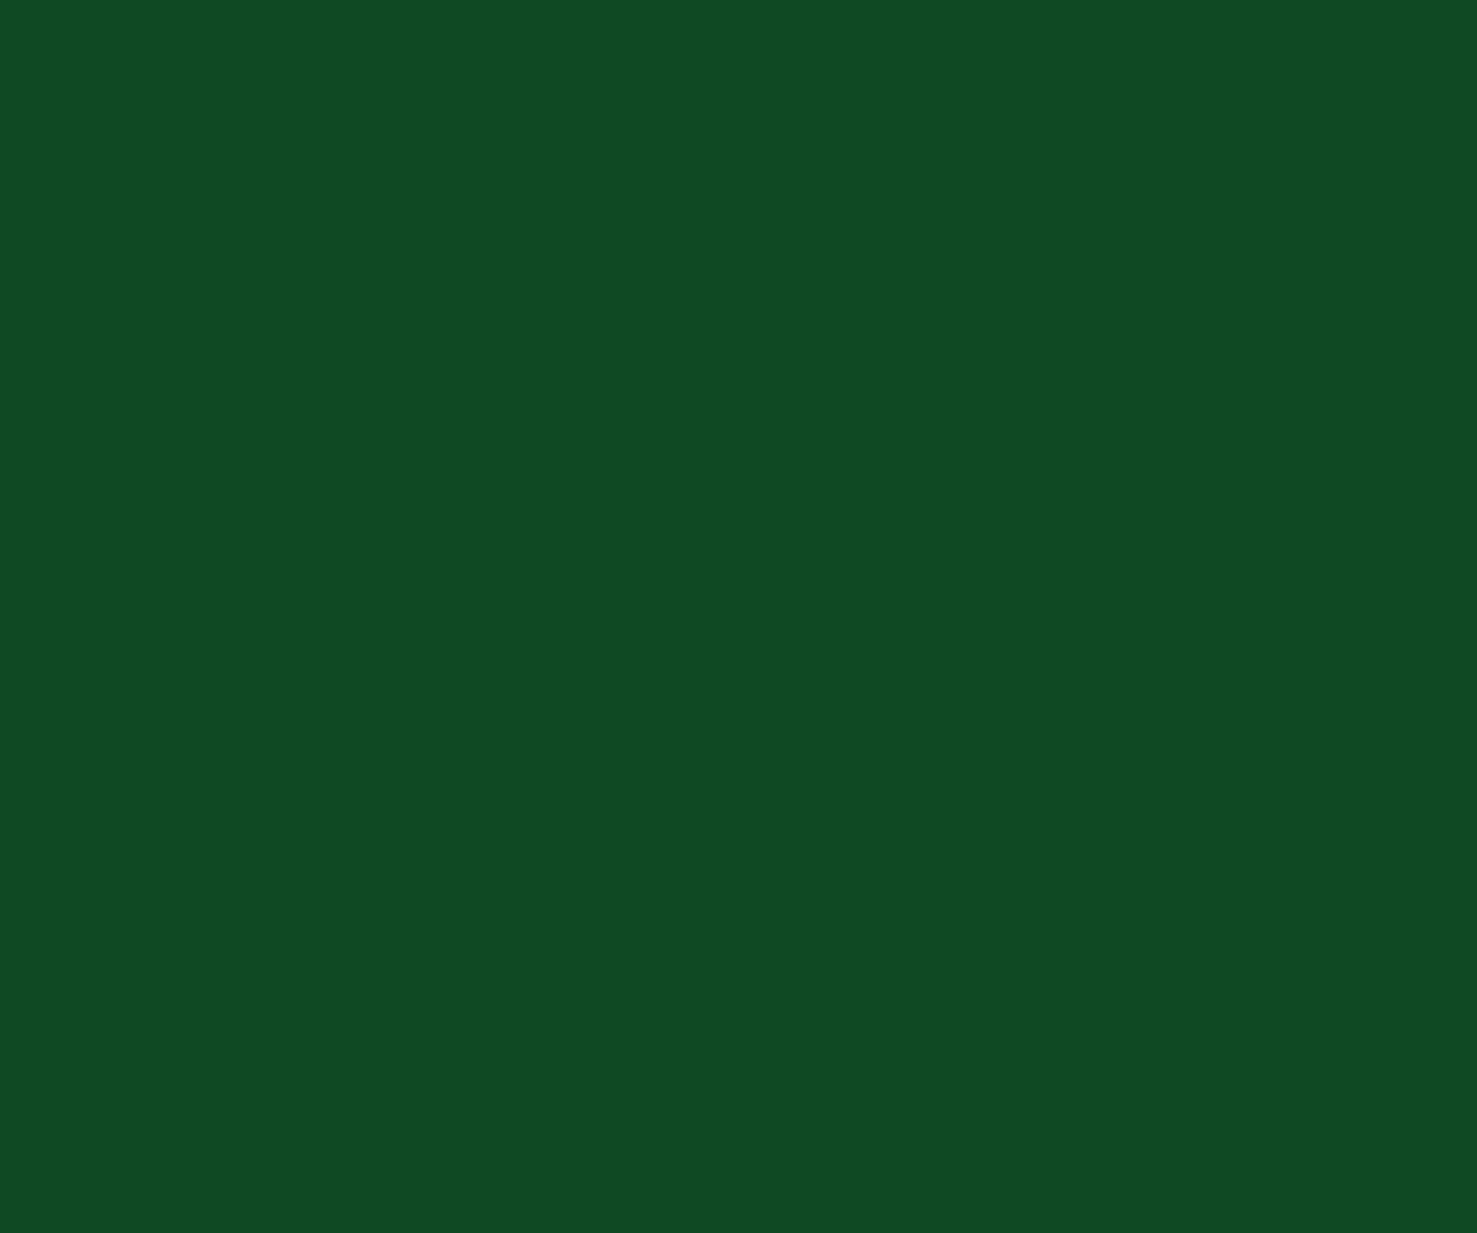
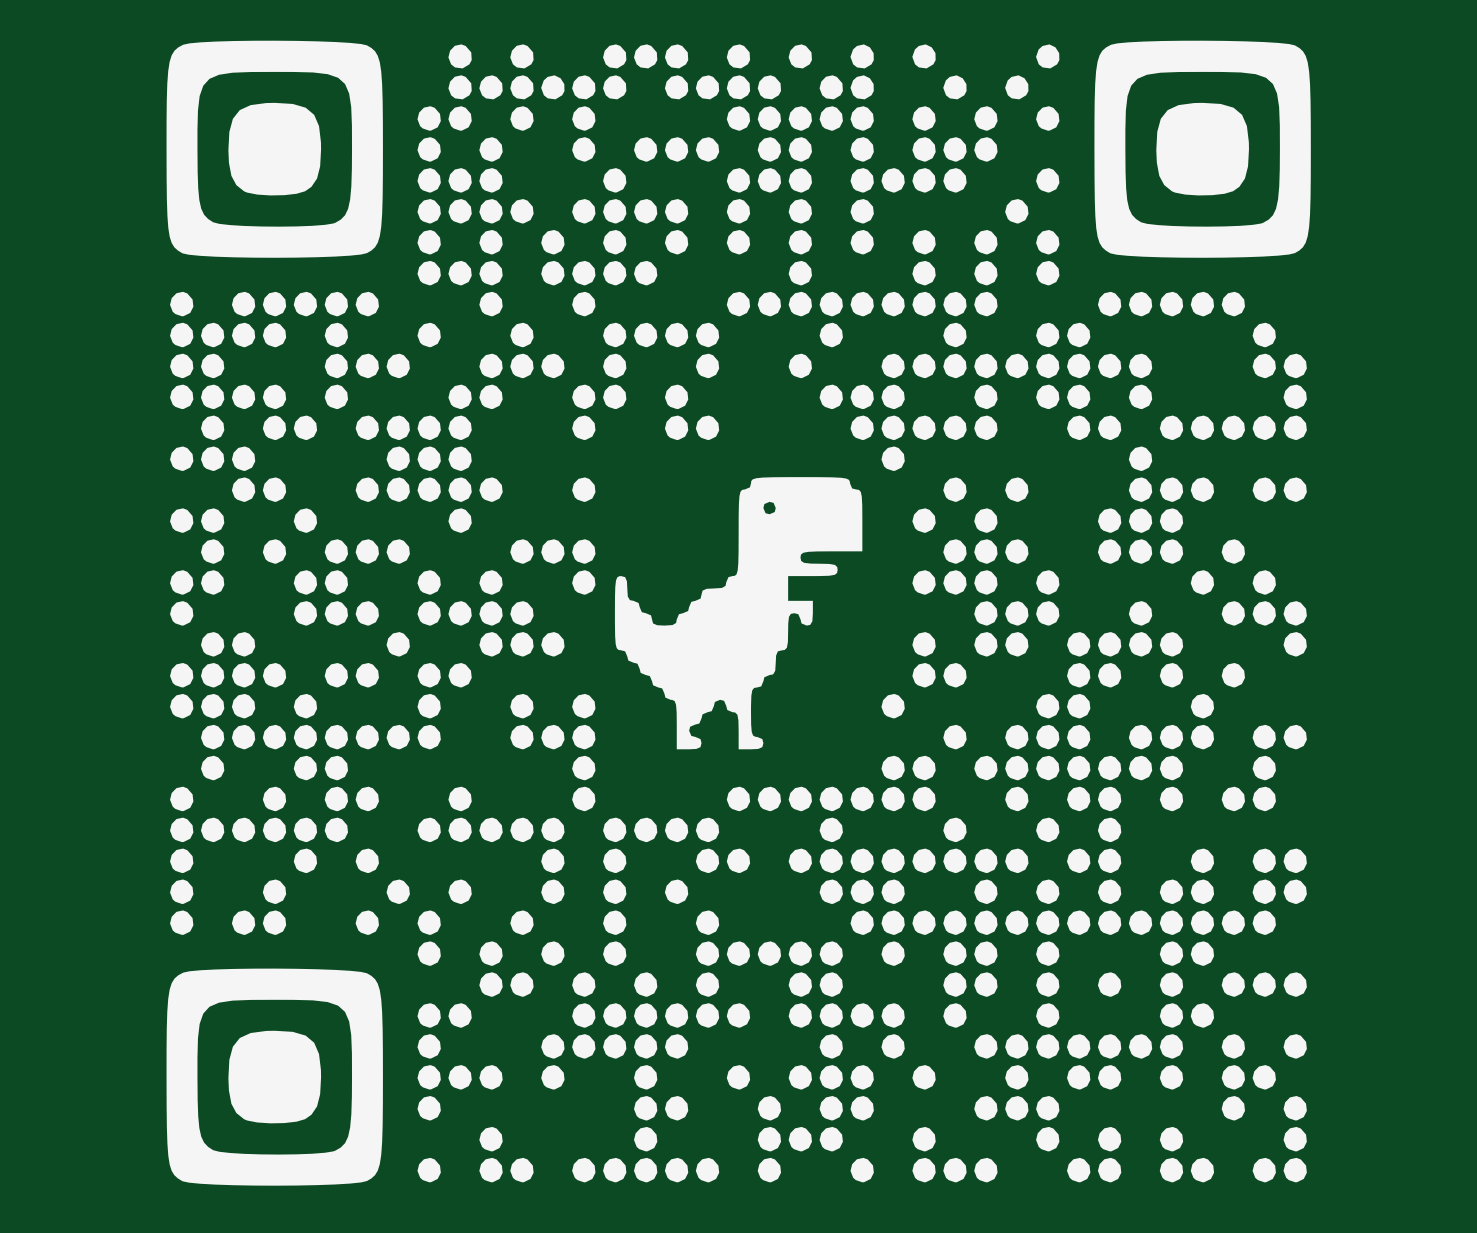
drawing: none -> [166, 40, 1311, 1186]

